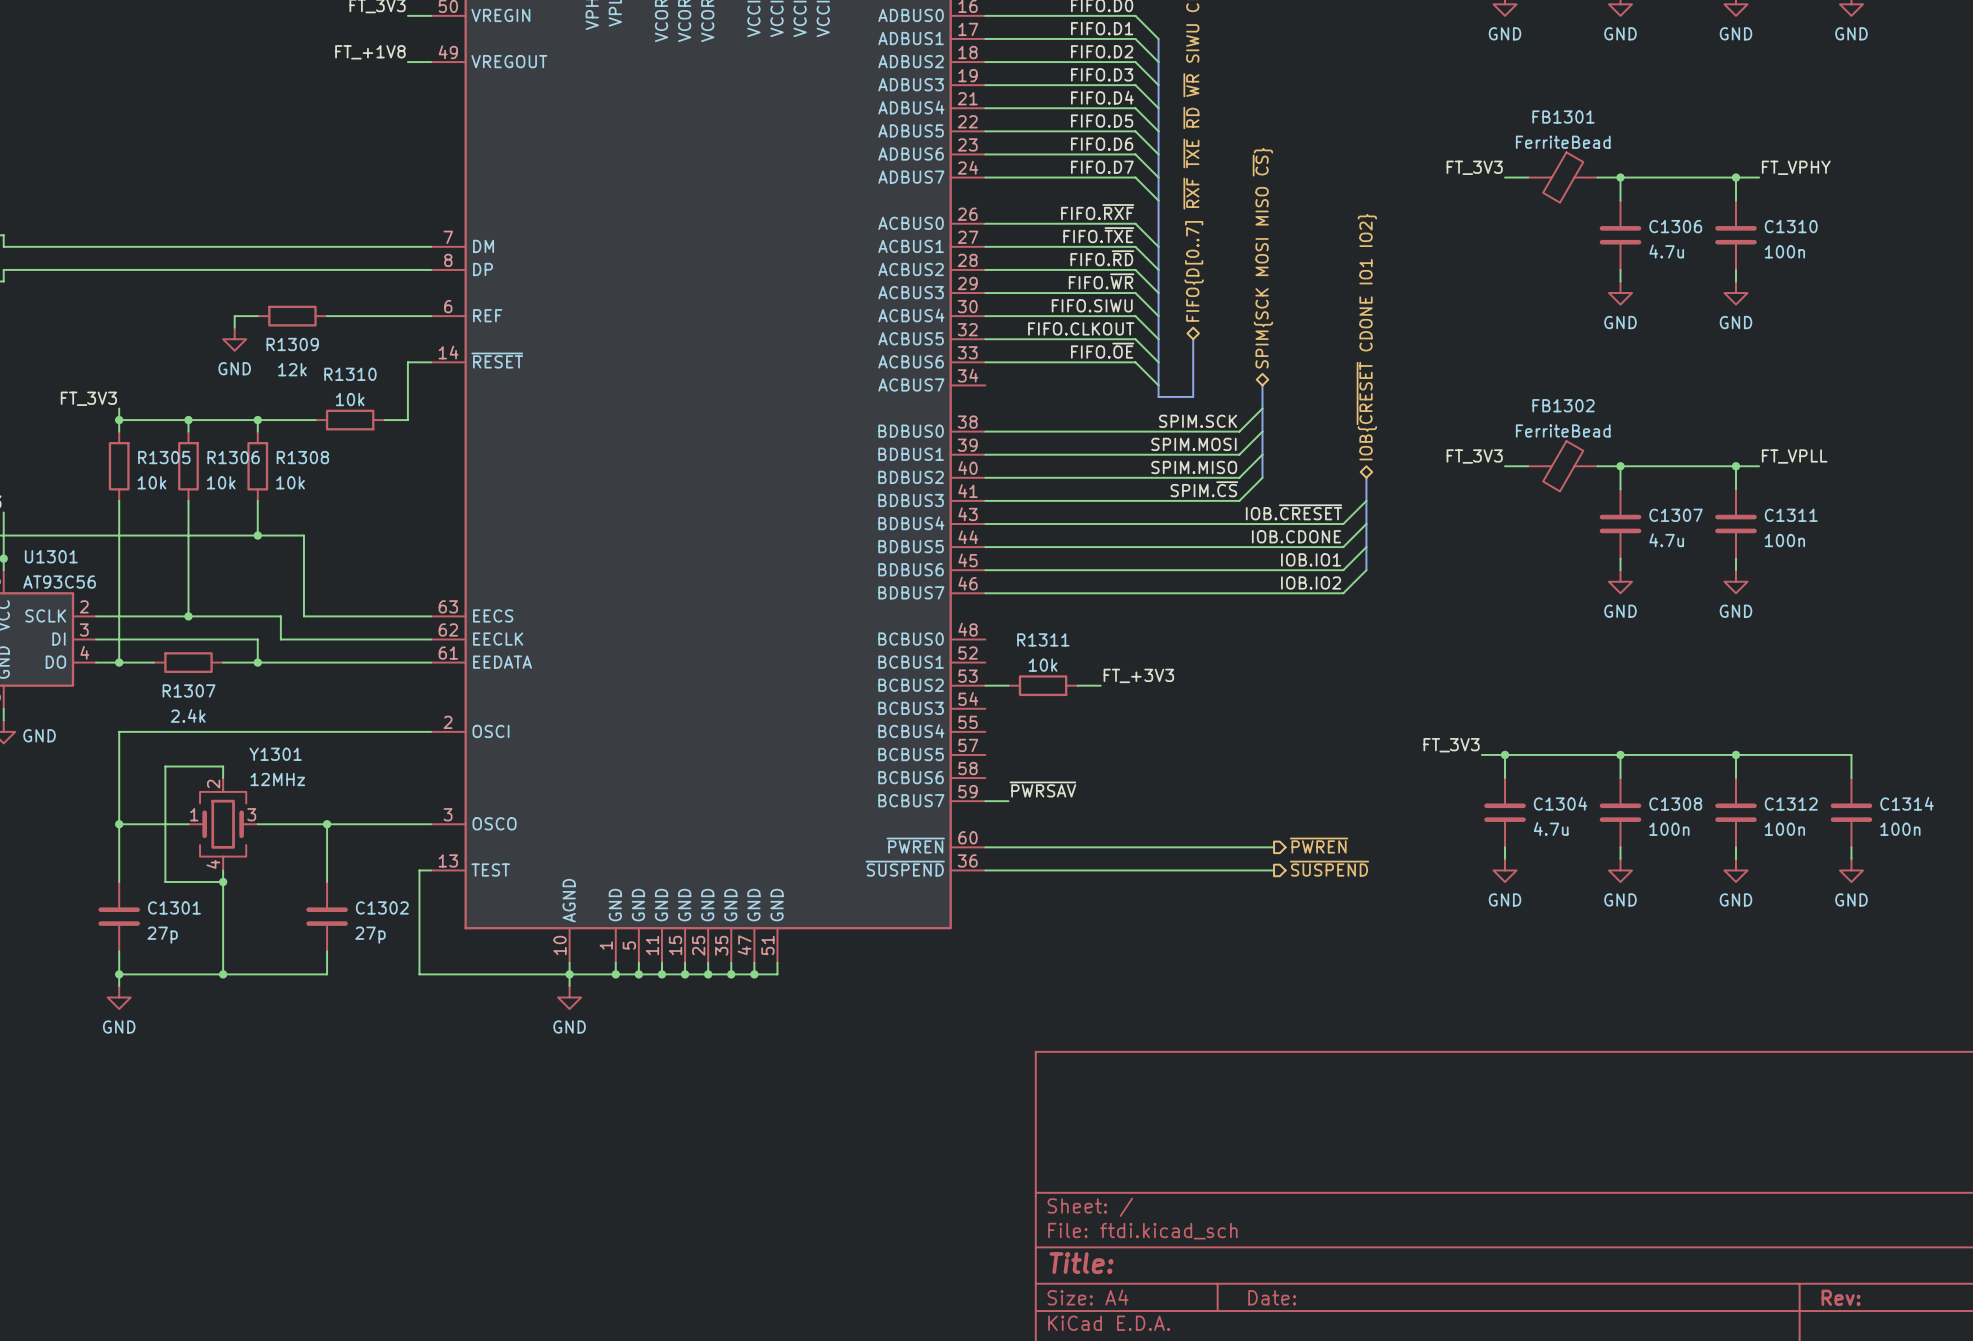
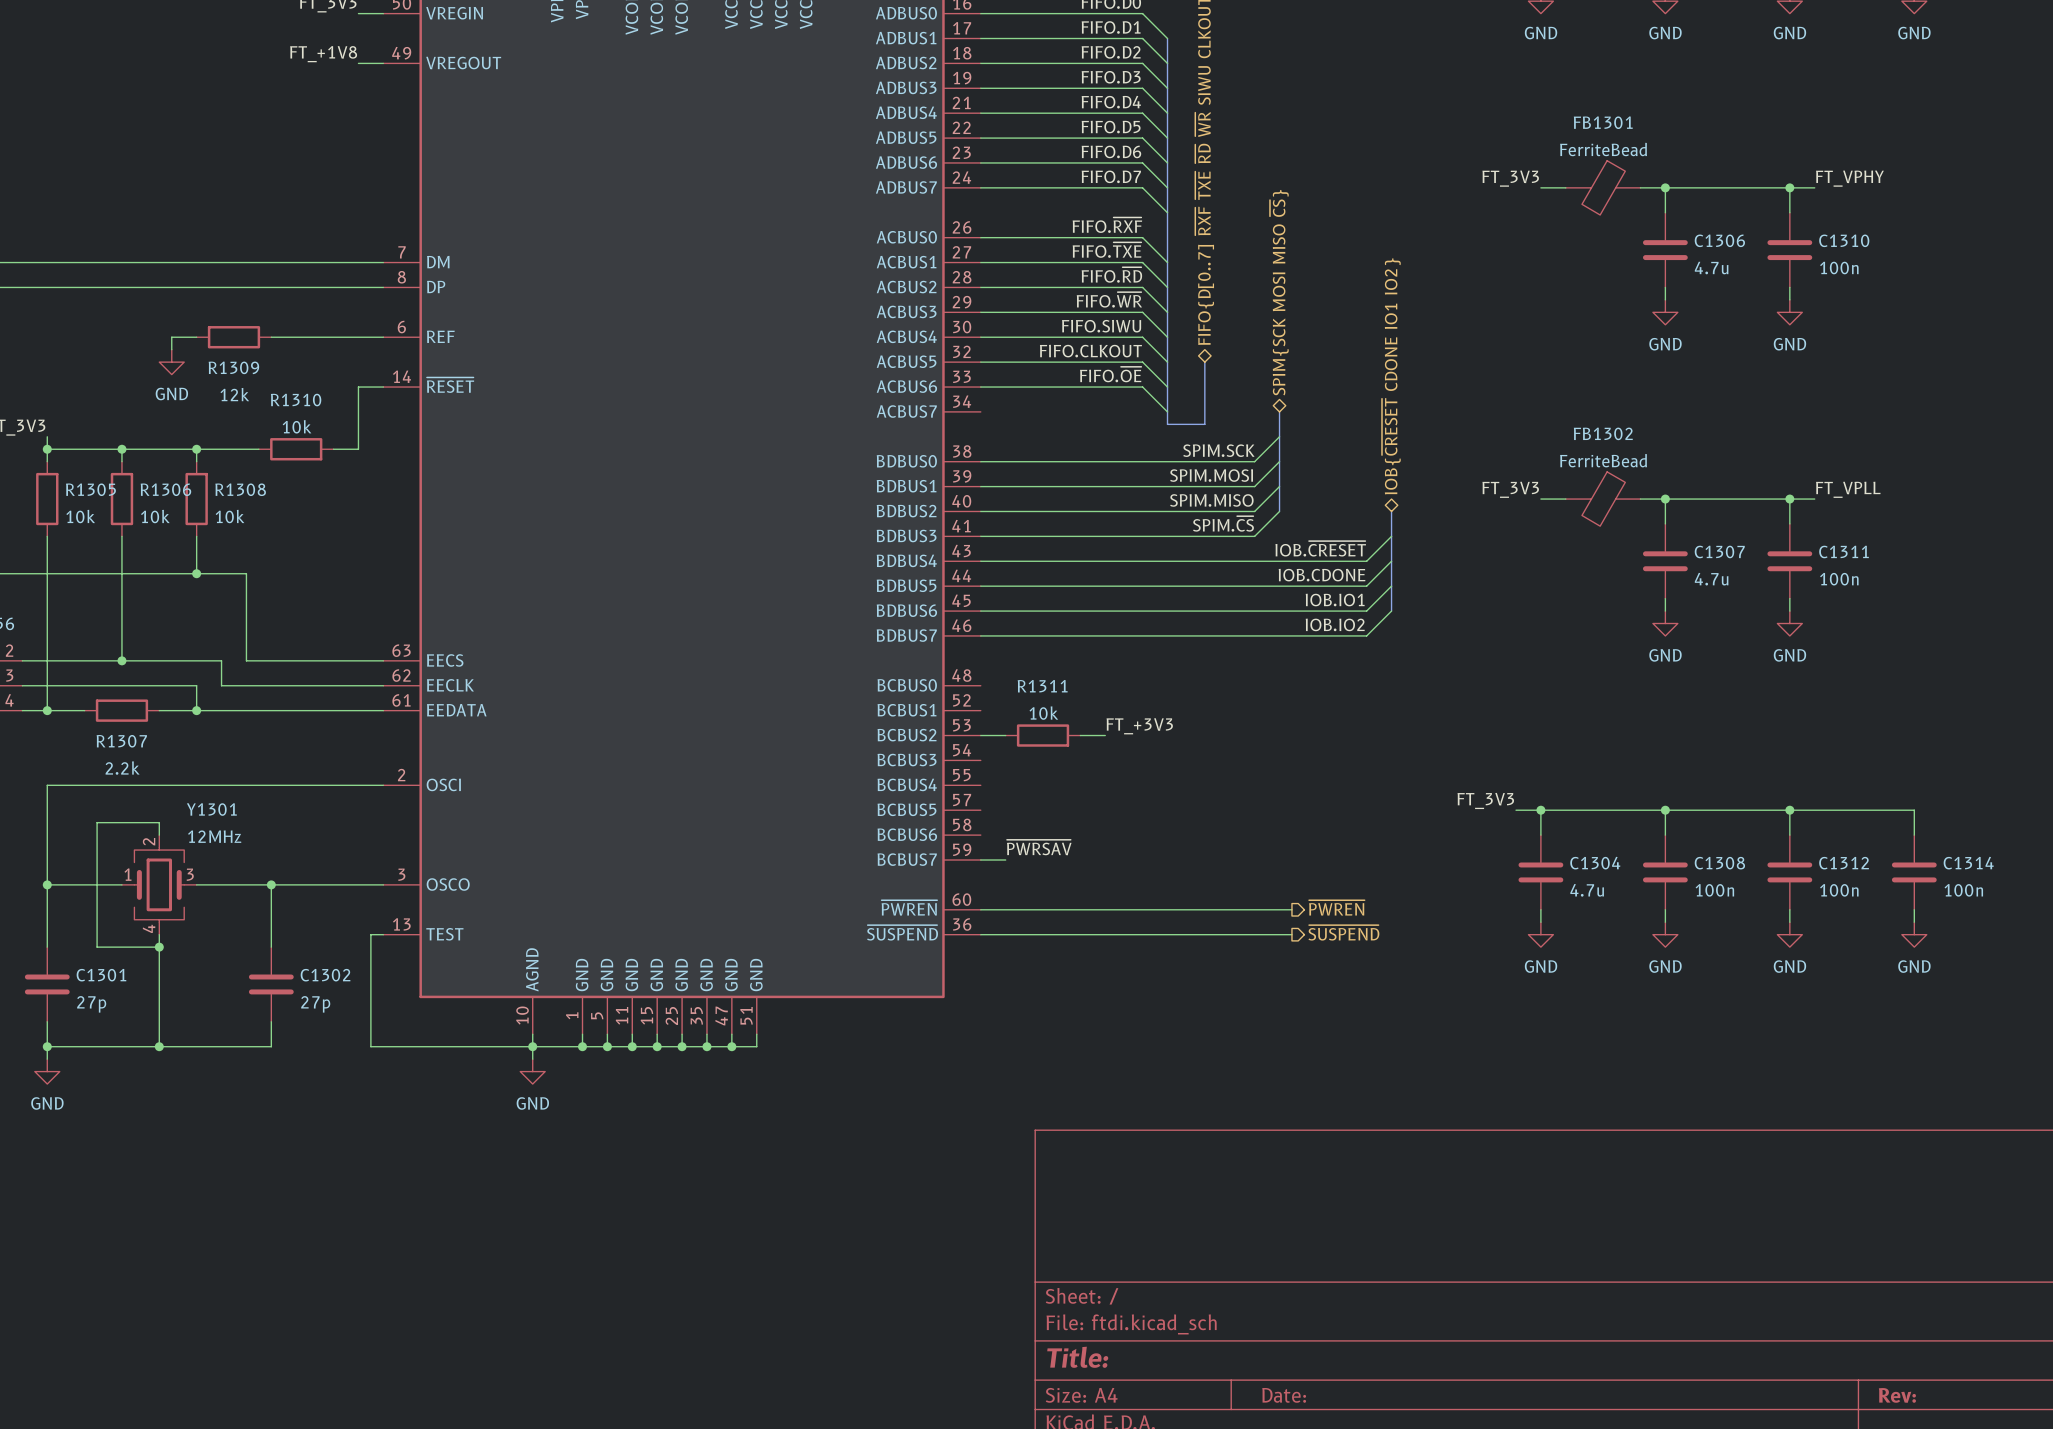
R1307 value: 2.4k (188, 715) -> 2.2k (122, 768)

